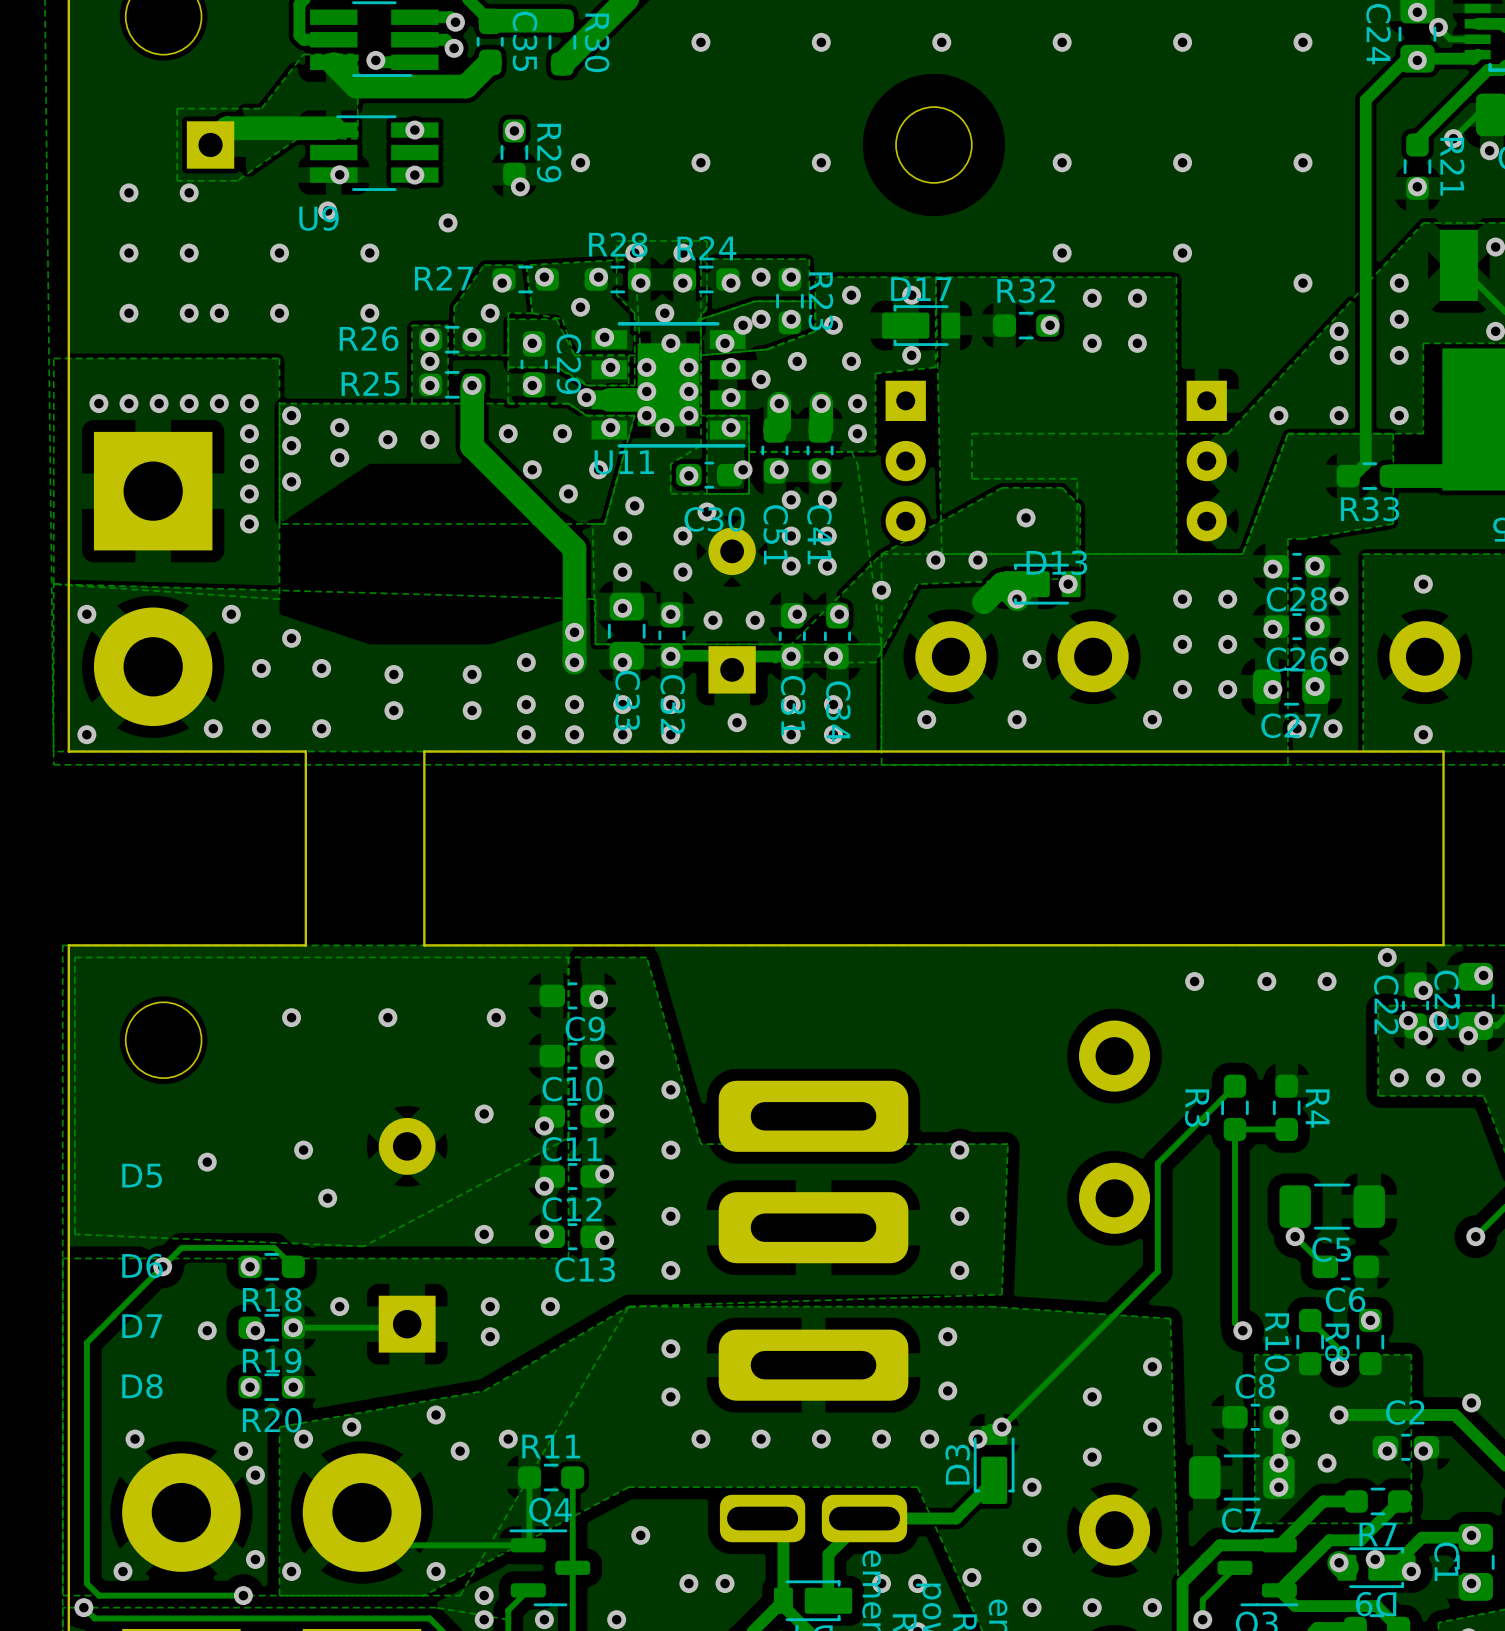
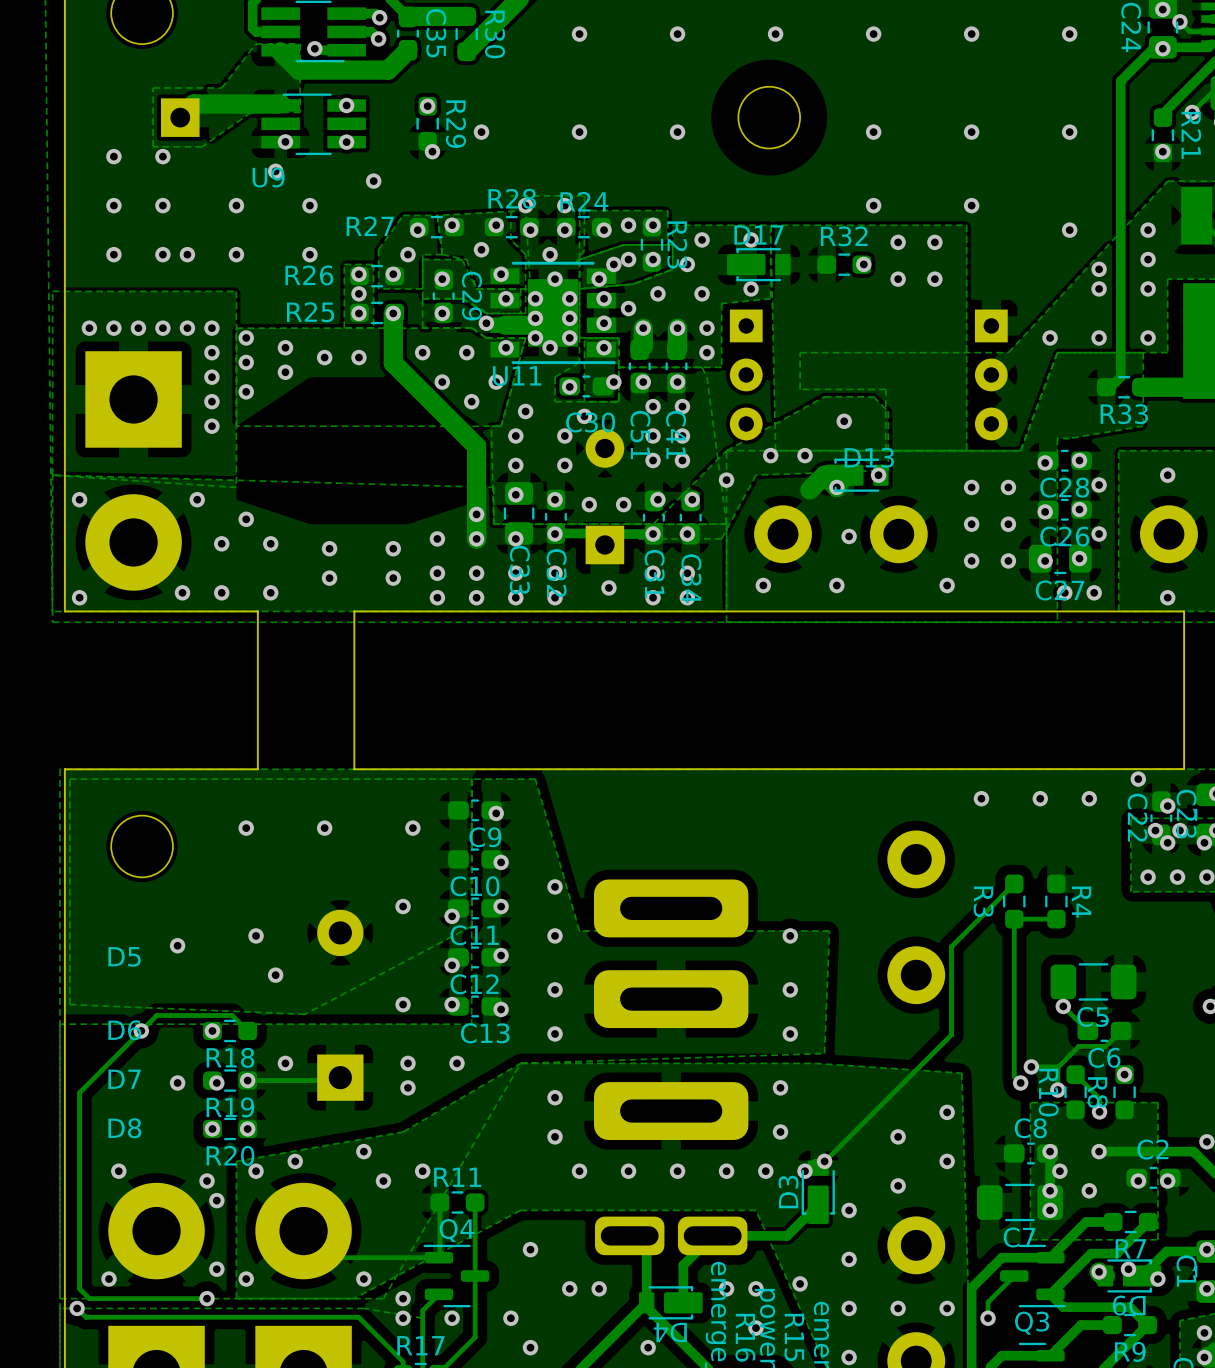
track: none -> (1121, 1030) (1105, 1046) (1078, 1046) (1057, 1067) (1057, 1090)
via: none -> (1031, 1066)
track: none -> (1058, 1066) (1031, 1066)
via: none -> (1057, 1090)

